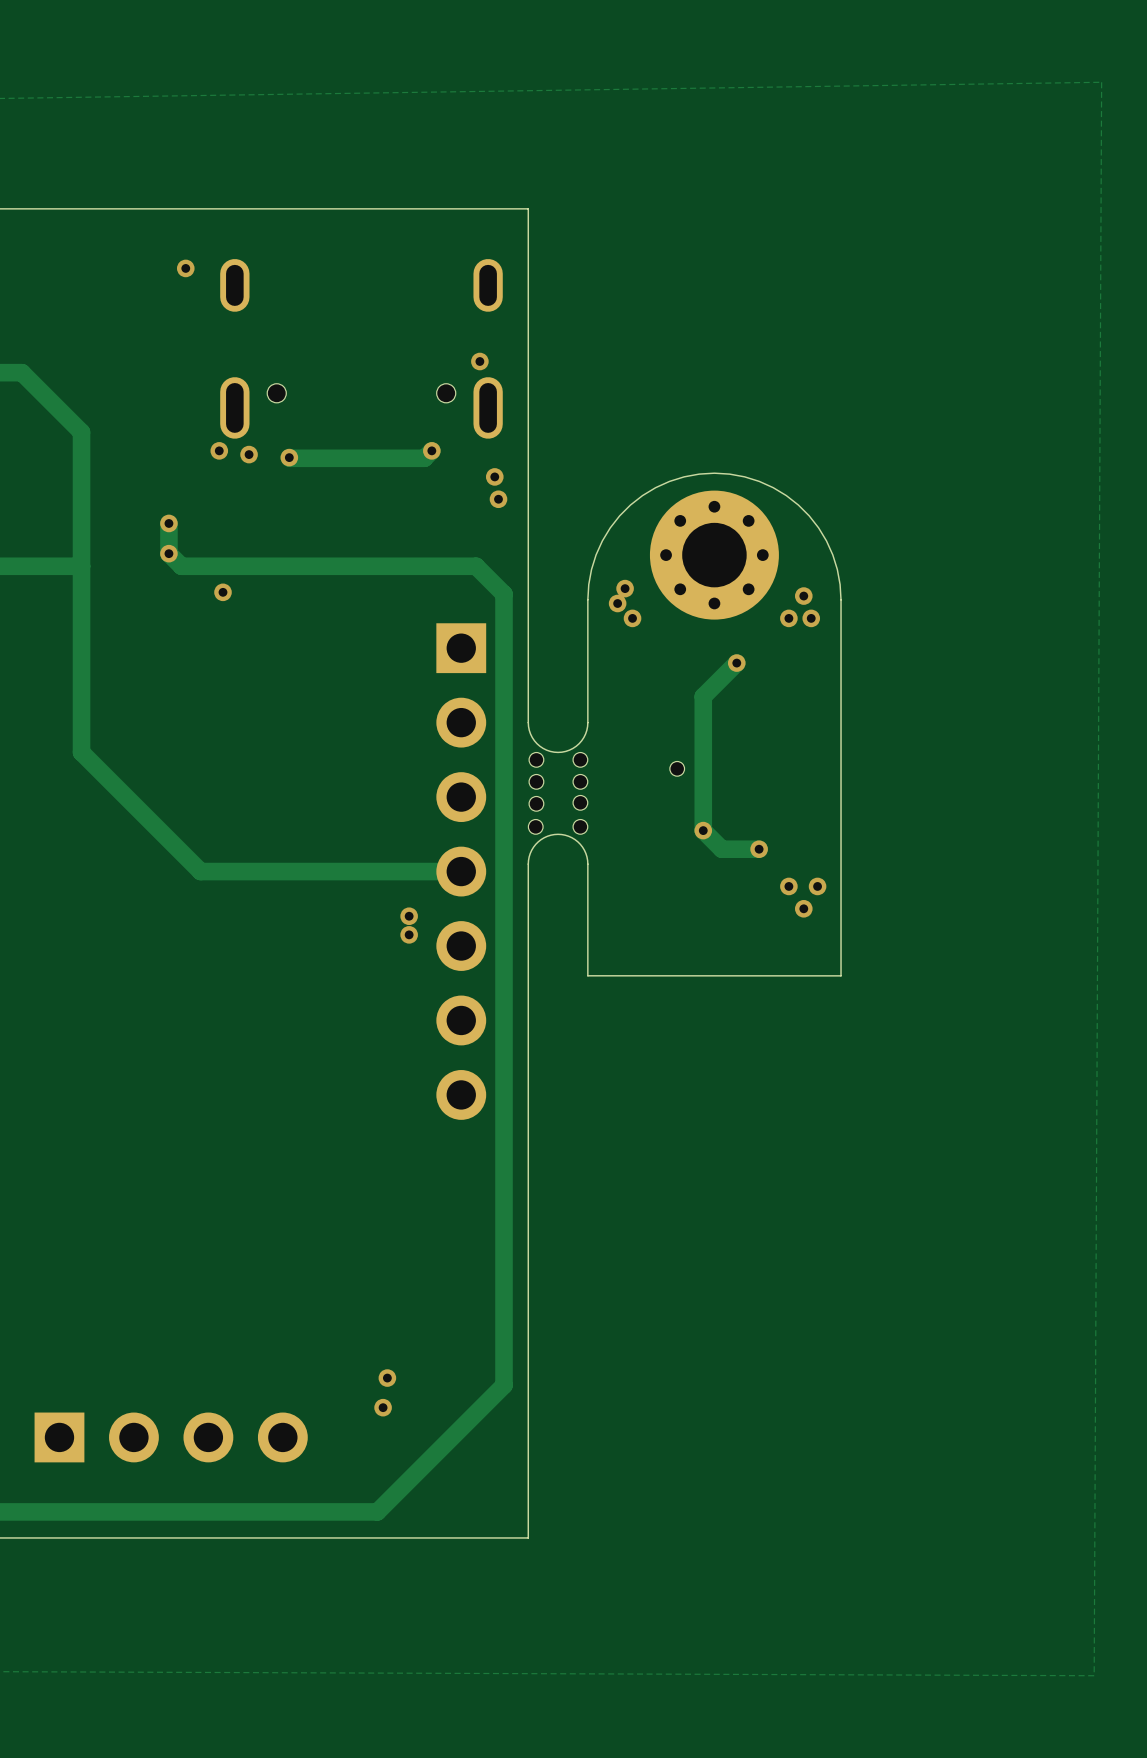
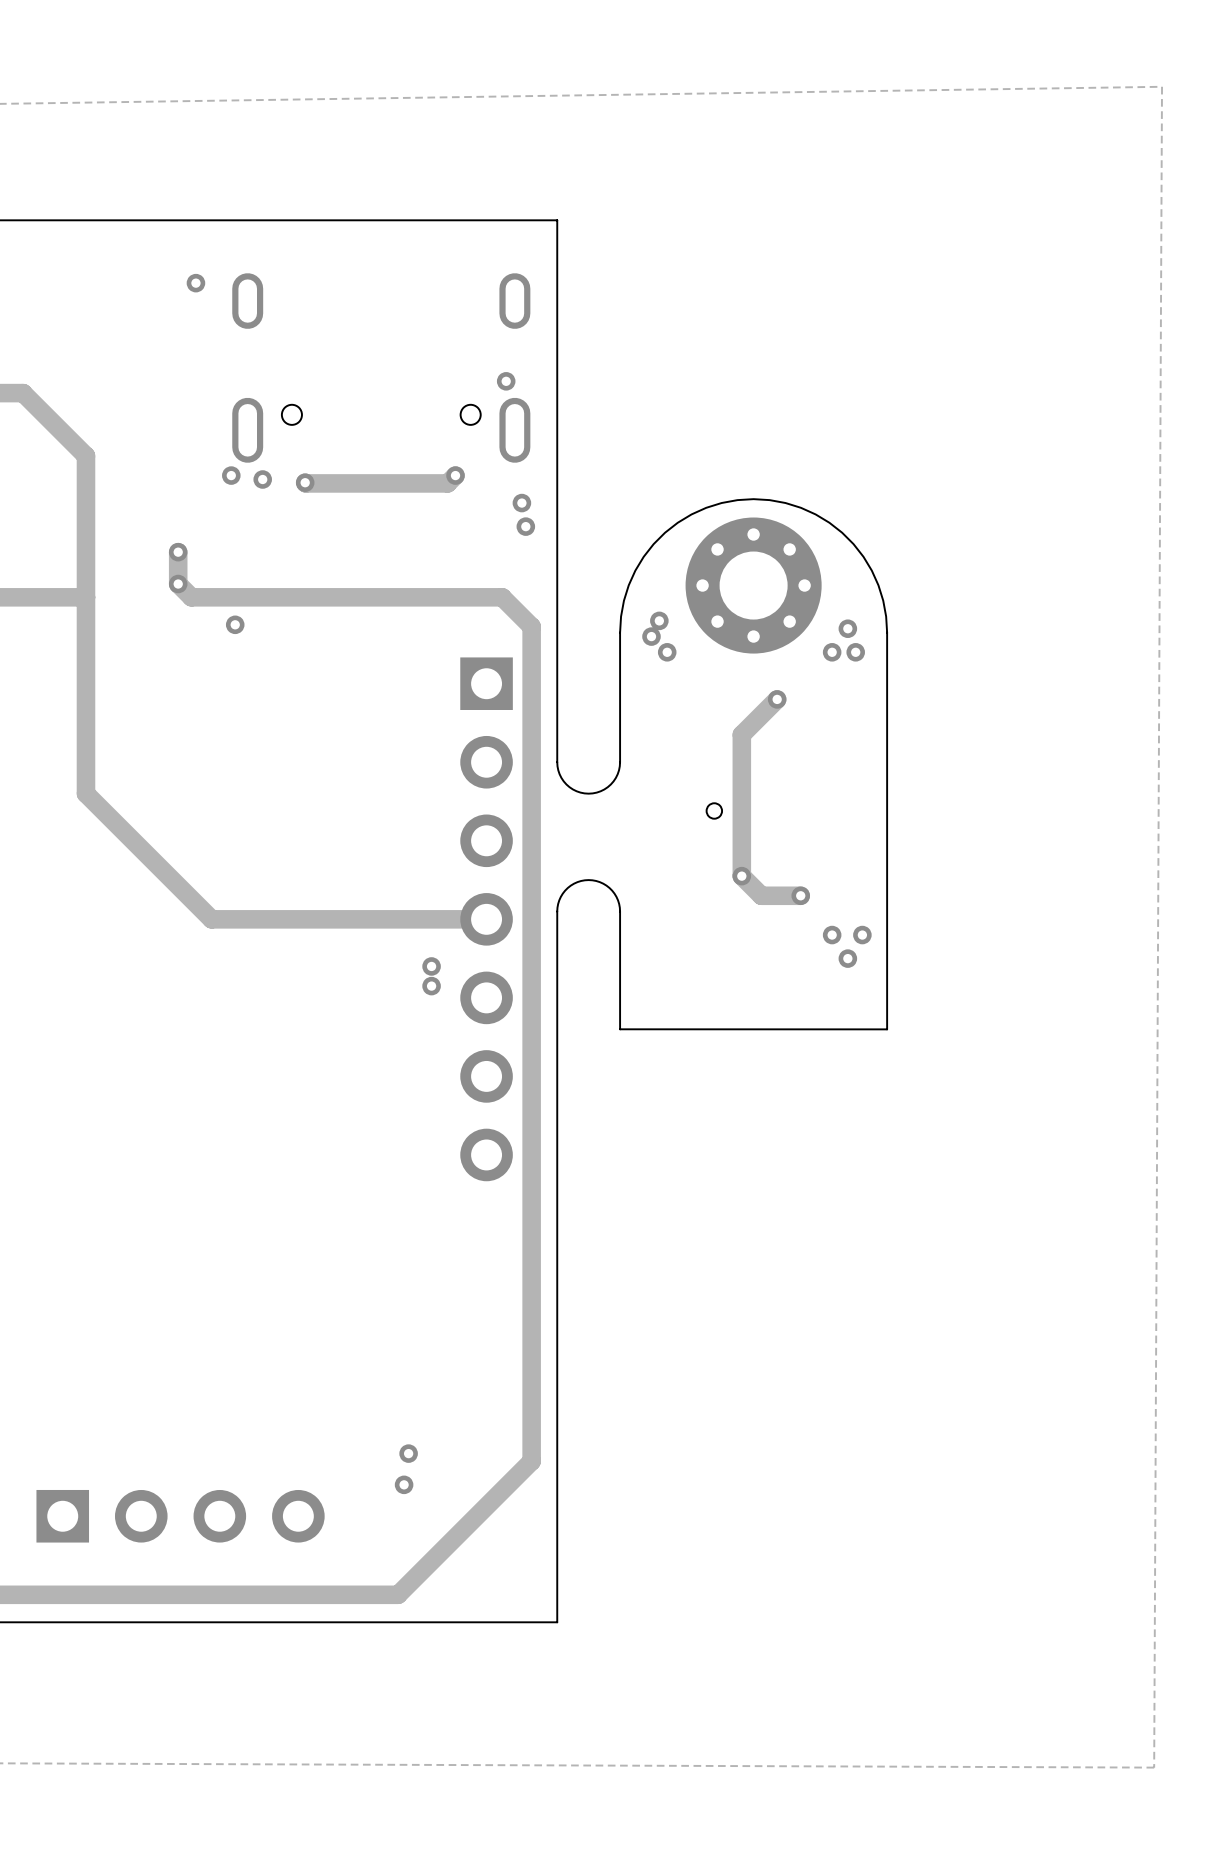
part: (536, 759) -> none
part: (580, 759) -> none
part: (536, 781) -> none
part: (580, 781) -> none
part: (580, 802) -> none
part: (536, 803) -> none
part: (535, 826) -> none
part: (580, 826) -> none

